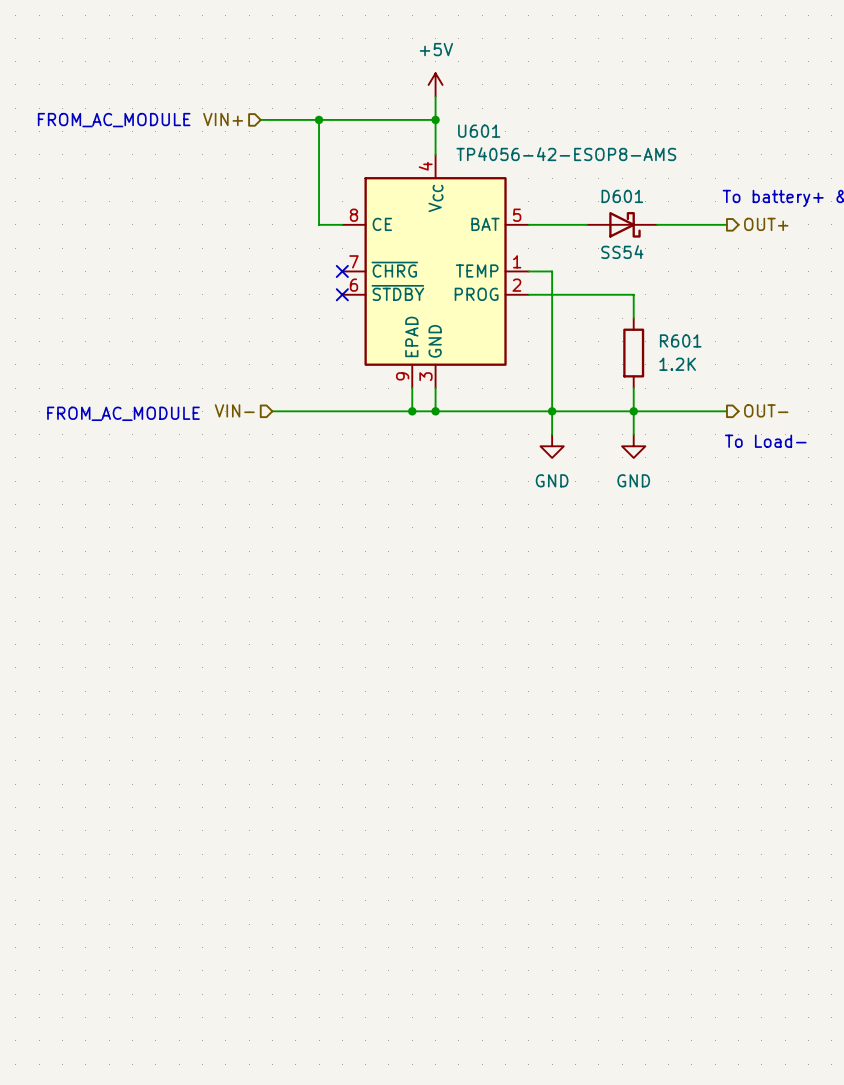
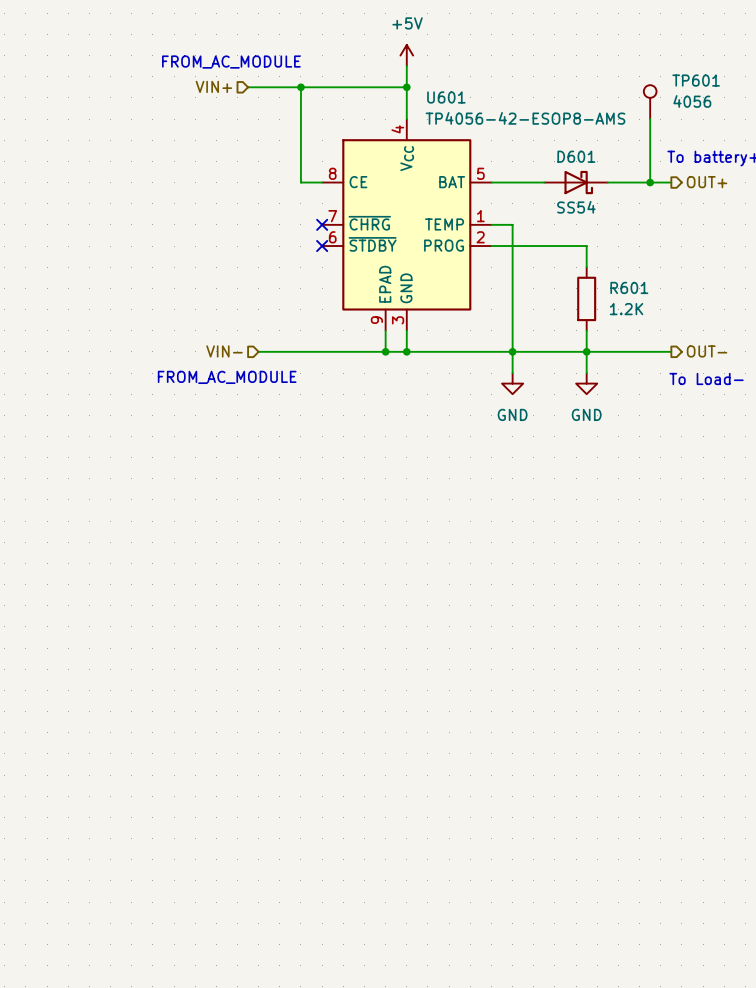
text position: FROM_AC_MODULE (114, 120) -> FROM_AC_MODULE (231, 62)
TP601: none -> 4056 (650, 102)
wire: none -> (650, 119) (650, 182)
junction: none -> (650, 182)
text position: FROM_AC_MODULE (123, 413) -> FROM_AC_MODULE (227, 377)

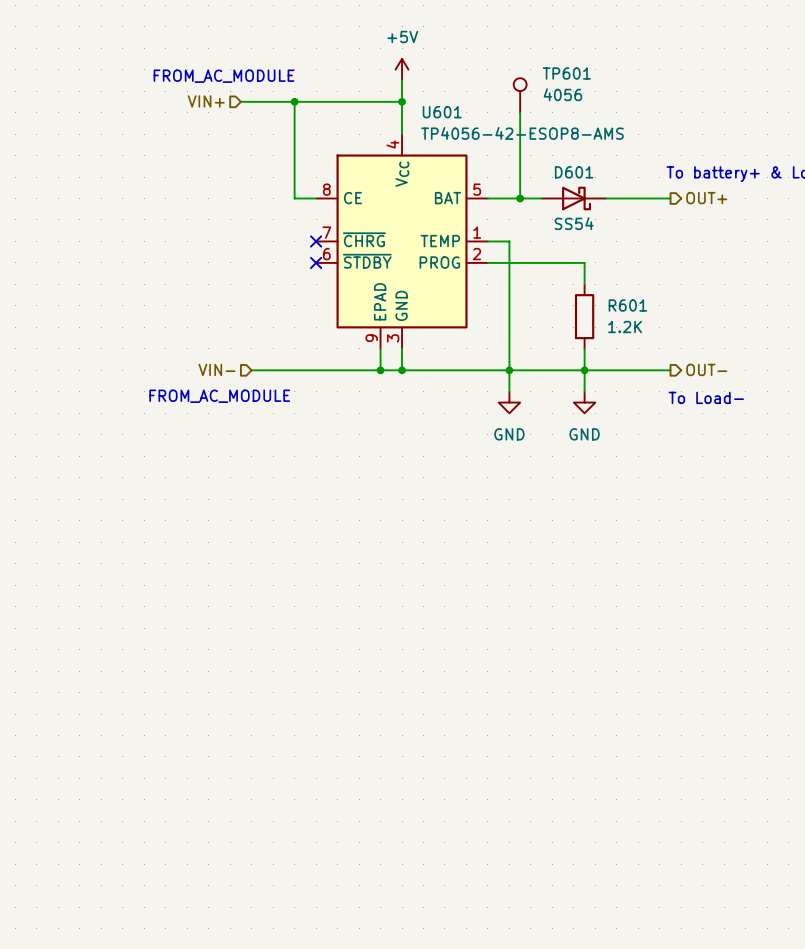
wire: none -> (520, 112) (520, 198)
TP601 position: (650, 102) -> (520, 95)
wire: (650, 119) (650, 182) -> none
junction: none -> (520, 198)
junction: (650, 182) -> none

